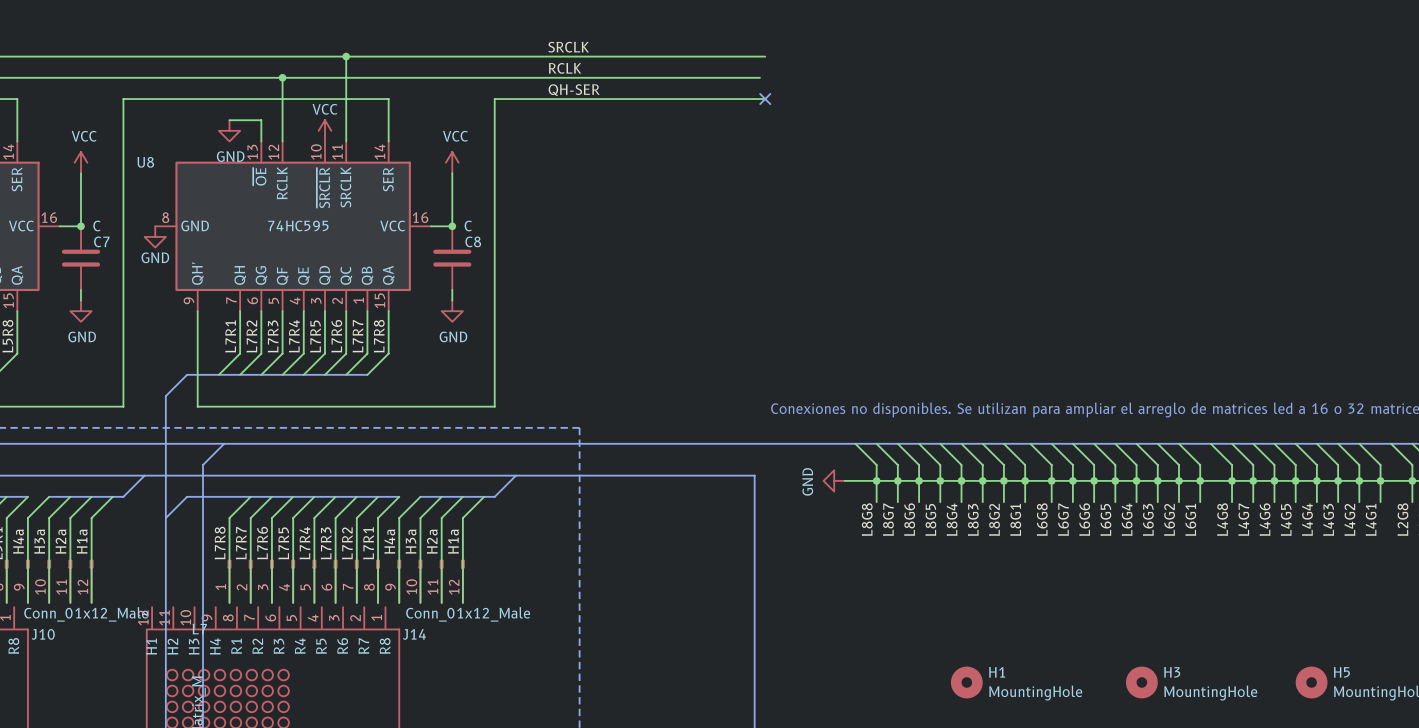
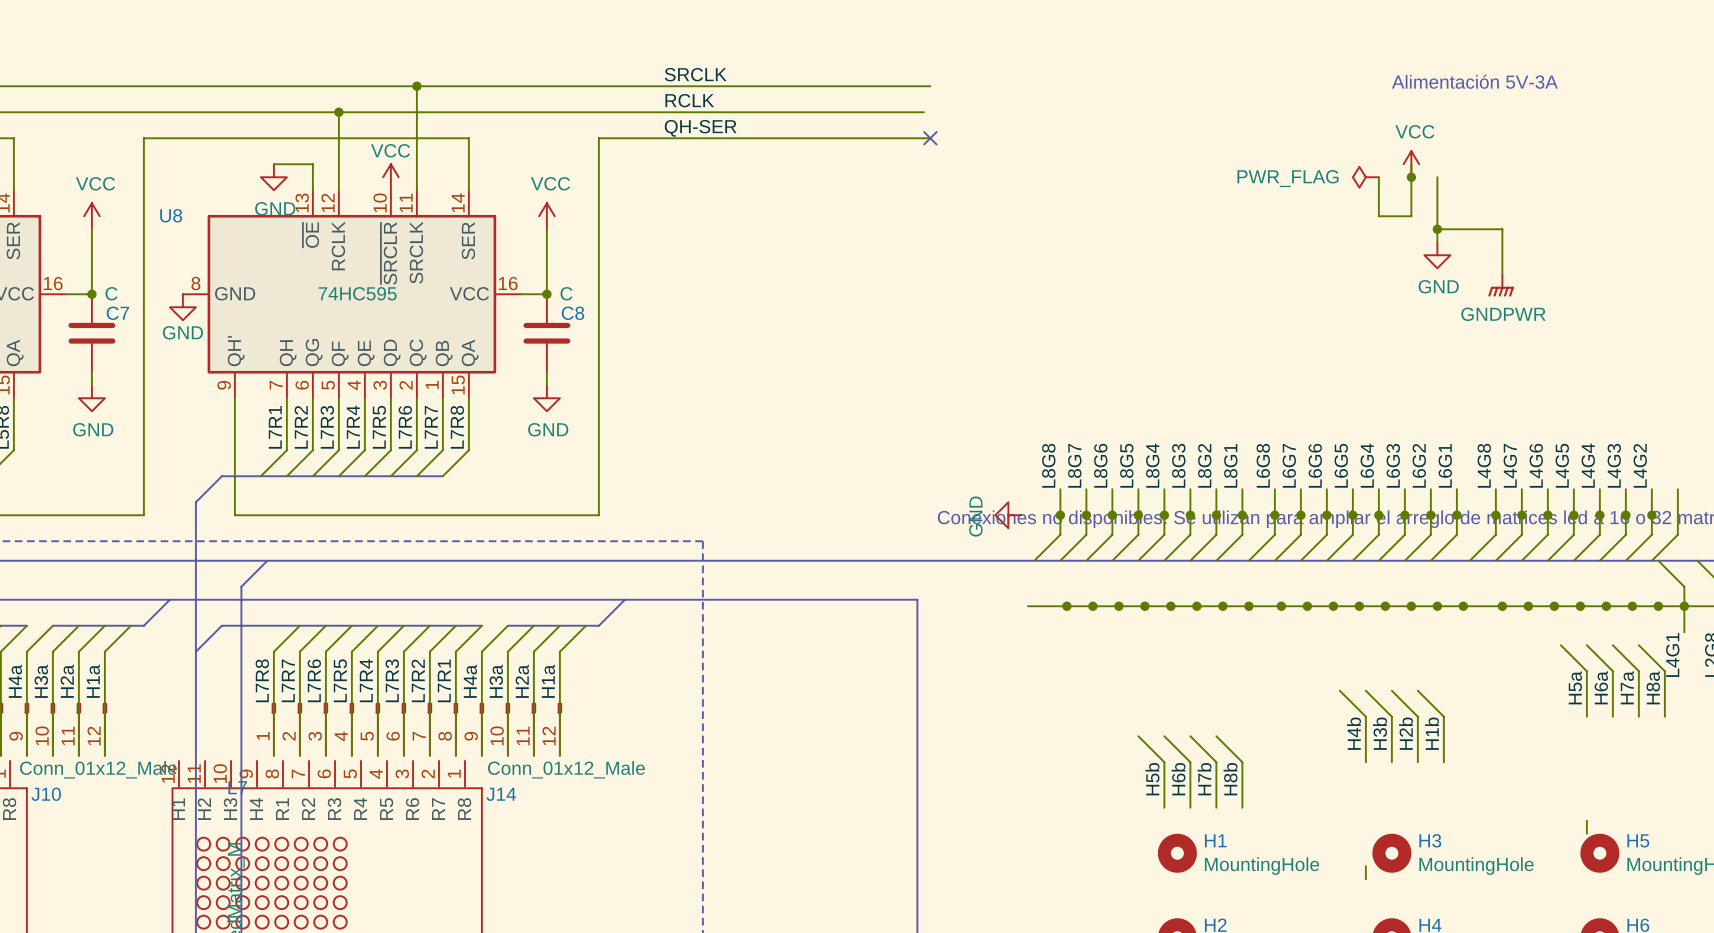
text: none -> Alimentación 5V-3A (1474, 81)
wire: none -> (1411, 164) (1411, 216) (1378, 216) (1378, 177)
power symbol: none -> VCC (1411, 164)
power symbol: none -> PWR_FLAG (1365, 177)
junction: none -> (1411, 177)
wire: none -> (1437, 177) (1437, 242)
wire: none -> (1437, 229) (1502, 229) (1502, 274)
junction: none -> (1437, 229)
power symbol: none -> GND (1437, 255)
power symbol: none -> GNDPWR (1501, 285)
wire: none -> (1060, 489) (1060, 534) (1034, 560)
wire: none -> (1086, 489) (1086, 534) (1060, 560)
wire: none -> (1112, 489) (1112, 534) (1086, 560)
wire: none -> (1138, 489) (1138, 534) (1112, 560)
wire: none -> (1164, 489) (1164, 534) (1138, 560)
wire: none -> (1190, 489) (1190, 534) (1164, 560)
wire: none -> (1216, 489) (1216, 534) (1190, 560)
wire: none -> (1242, 489) (1242, 534) (1216, 560)
wire: none -> (1274, 489) (1274, 534) (1248, 560)
wire: none -> (1300, 489) (1300, 534) (1274, 560)
wire: none -> (1326, 489) (1326, 534) (1300, 560)
wire: none -> (1352, 489) (1352, 534) (1326, 560)
wire: none -> (1378, 489) (1378, 534) (1352, 560)
wire: none -> (1404, 489) (1404, 534) (1378, 560)
wire: none -> (1430, 489) (1430, 534) (1404, 560)
wire: none -> (1456, 489) (1456, 534) (1430, 560)
wire: none -> (1495, 489) (1495, 534) (1469, 560)
wire: none -> (1521, 489) (1521, 534) (1495, 560)
wire: none -> (1547, 489) (1547, 534) (1521, 560)
wire: none -> (1573, 489) (1573, 534) (1547, 560)
wire: none -> (1599, 489) (1599, 534) (1573, 560)
wire: none -> (1625, 489) (1625, 534) (1599, 560)
wire: none -> (1651, 489) (1651, 534) (1625, 560)
wire: none -> (1677, 489) (1677, 534) (1651, 560)
junction: none -> (1060, 515)
junction: none -> (1086, 515)
junction: none -> (1112, 515)
junction: none -> (1138, 515)
junction: none -> (1164, 515)
junction: none -> (1190, 515)
junction: none -> (1216, 515)
junction: none -> (1242, 515)
junction: none -> (1274, 515)
junction: none -> (1300, 515)
junction: none -> (1326, 515)
junction: none -> (1352, 515)
junction: none -> (1378, 515)
junction: none -> (1404, 515)
junction: none -> (1430, 515)
junction: none -> (1456, 515)
junction: none -> (1495, 515)
junction: none -> (1521, 515)
junction: none -> (1547, 515)
junction: none -> (1573, 515)
junction: none -> (1599, 515)
junction: none -> (1625, 515)
junction: none -> (1651, 515)
wire: (855, 443) (876, 465) (876, 502) -> none
wire: (876, 443) (897, 465) (897, 502) -> none
wire: (897, 443) (919, 465) (919, 502) -> none
wire: (919, 443) (940, 465) (940, 502) -> none
wire: (940, 443) (961, 465) (961, 502) -> (1138, 736) (1164, 762) (1164, 807)
wire: (961, 443) (982, 465) (982, 502) -> (1164, 736) (1190, 762) (1190, 807)
wire: (982, 443) (1003, 465) (1003, 502) -> (1190, 736) (1216, 762) (1216, 807)
wire: (1003, 443) (1025, 465) (1025, 502) -> (1216, 736) (1242, 762) (1242, 807)
wire: (1030, 443) (1051, 465) (1051, 502) -> none
wire: (1051, 443) (1072, 465) (1072, 502) -> none
wire: (1072, 443) (1094, 465) (1094, 502) -> none
wire: (1094, 443) (1115, 465) (1115, 502) -> (1339, 690) (1365, 716) (1365, 762)
wire: (1115, 443) (1136, 465) (1136, 502) -> (1365, 690) (1391, 716) (1391, 762)
wire: (1136, 443) (1157, 465) (1157, 502) -> (1391, 690) (1417, 716) (1417, 762)
wire: (1157, 443) (1178, 465) (1178, 502) -> (1417, 690) (1443, 716) (1443, 762)
wire: (1178, 443) (1200, 465) (1200, 502) -> none
wire: (1210, 443) (1232, 465) (1232, 502) -> none
wire: (1232, 443) (1253, 465) (1253, 502) -> none
wire: (1253, 443) (1274, 465) (1274, 502) -> none
wire: (1274, 443) (1295, 465) (1295, 502) -> (1560, 645) (1586, 671) (1586, 716)
wire: (1295, 443) (1316, 465) (1316, 502) -> (1586, 645) (1612, 671) (1612, 716)
wire: (1316, 443) (1338, 465) (1338, 502) -> (1612, 645) (1638, 671) (1638, 716)
wire: (1338, 443) (1359, 465) (1359, 502) -> (1638, 645) (1664, 671) (1664, 716)
power symbol position: GND (834, 480) -> GND (1008, 515)
label position: L8G8 (867, 519) -> L8G8 (1048, 465)
label position: L8G7 (888, 519) -> L8G7 (1074, 465)
label position: L8G6 (909, 519) -> L8G6 (1100, 465)
label position: L8G5 (930, 519) -> L8G5 (1126, 465)
label position: L8G4 (952, 519) -> L8G4 (1152, 465)
label position: L8G3 (973, 519) -> L8G3 (1178, 465)
label position: L8G2 (994, 519) -> L8G2 (1204, 465)
label position: L8G1 (1015, 519) -> L8G1 (1230, 465)
label position: L6G8 (1042, 519) -> L6G8 (1263, 465)
label position: L6G7 (1063, 519) -> L6G7 (1289, 465)
label position: L6G6 (1084, 519) -> L6G6 (1315, 465)
label position: L6G5 (1105, 519) -> L6G5 (1341, 465)
label position: L6G4 (1127, 519) -> L6G4 (1367, 465)
label position: L6G3 (1148, 519) -> L6G3 (1393, 465)
label position: L6G2 (1169, 519) -> L6G2 (1419, 465)
label position: L6G1 (1190, 519) -> L6G1 (1445, 465)
label position: L4G8 (1222, 519) -> L4G8 (1484, 465)
label position: L4G7 (1243, 519) -> L4G7 (1510, 465)
label position: L4G6 (1265, 519) -> L4G6 (1536, 465)
label position: L4G5 (1286, 519) -> L4G5 (1562, 465)
label position: L4G4 (1307, 519) -> L4G4 (1588, 465)
label position: L4G3 (1328, 519) -> L4G3 (1614, 465)
label position: L4G2 (1349, 519) -> L4G2 (1640, 465)
label: none -> H5a (1575, 687)
label: none -> H6a (1601, 687)
label: none -> H7a (1627, 687)
label: none -> H8a (1653, 687)
label: none -> H4b (1354, 733)
label: none -> H3b (1380, 733)
label: none -> H2b (1406, 733)
label: none -> H1b (1432, 733)
label: none -> H5b (1152, 779)
label: none -> H6b (1178, 779)
label: none -> H7b (1204, 779)
label: none -> H8b (1230, 779)
wire: none -> (1586, 820) (1586, 833)
wire: none -> (1365, 866) (1365, 879)

